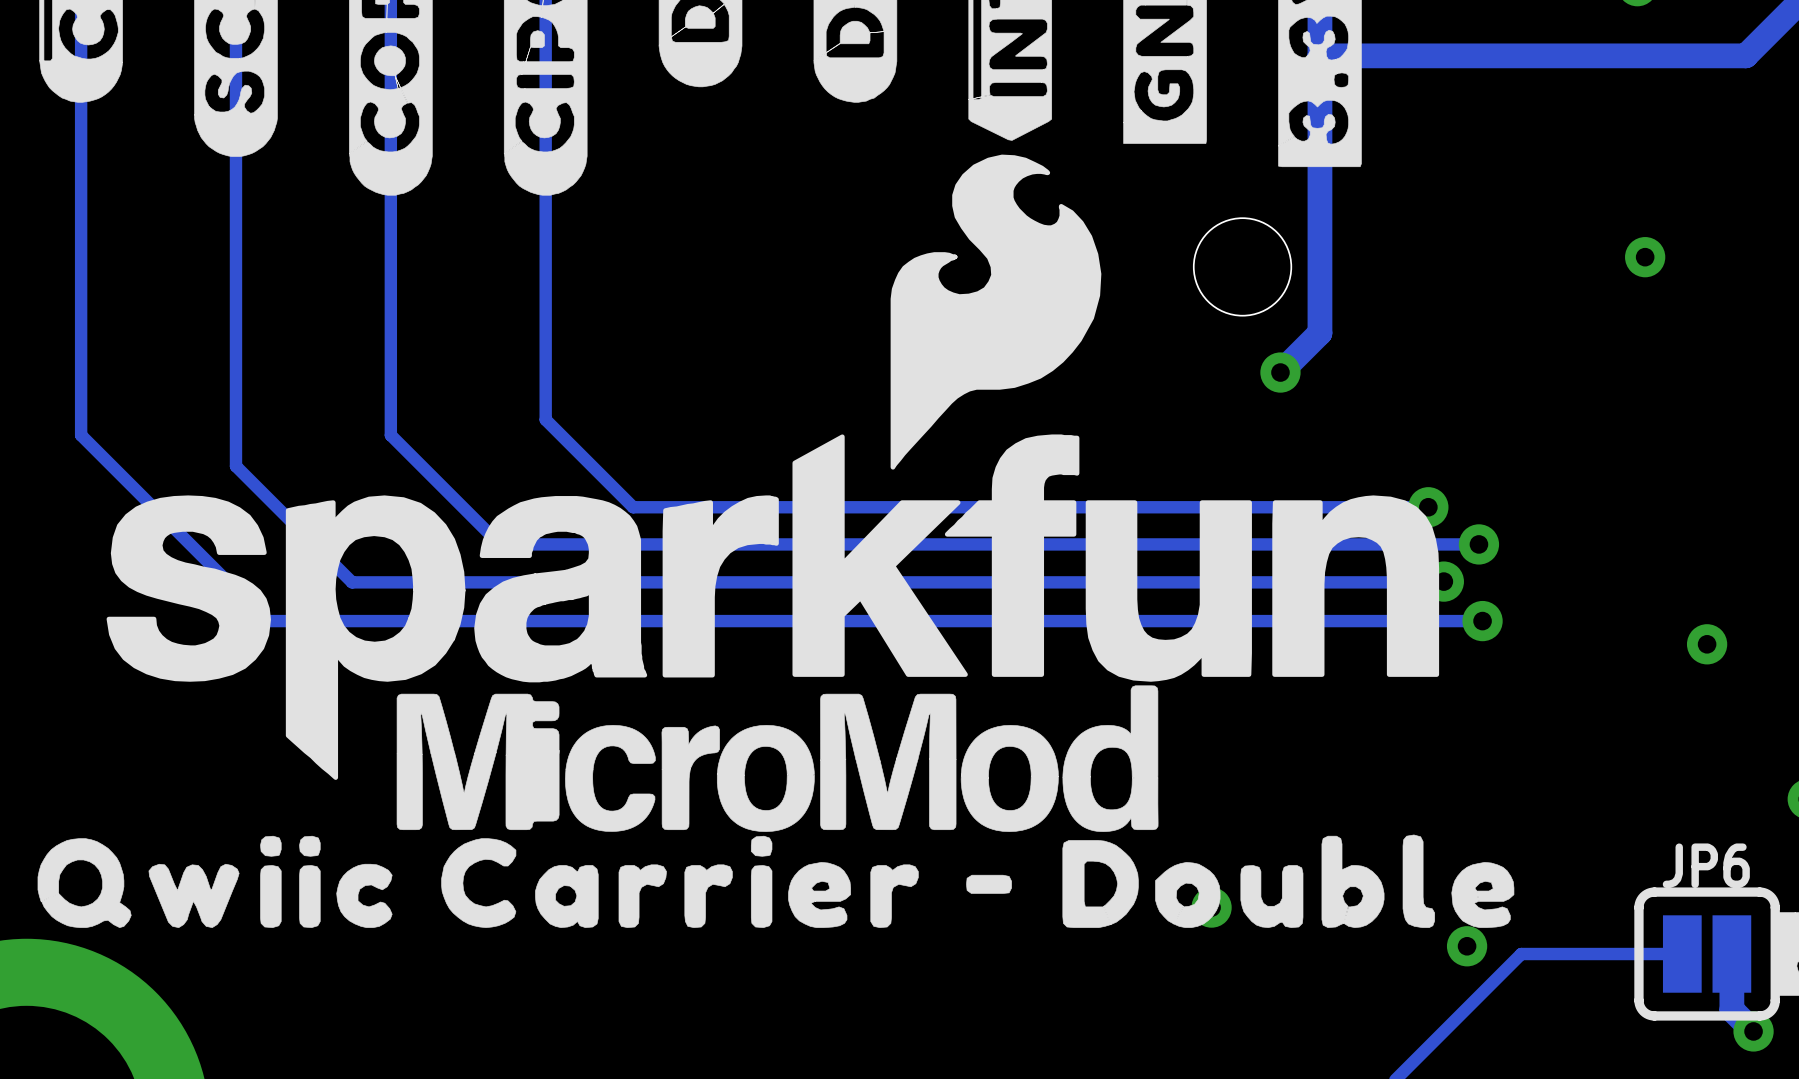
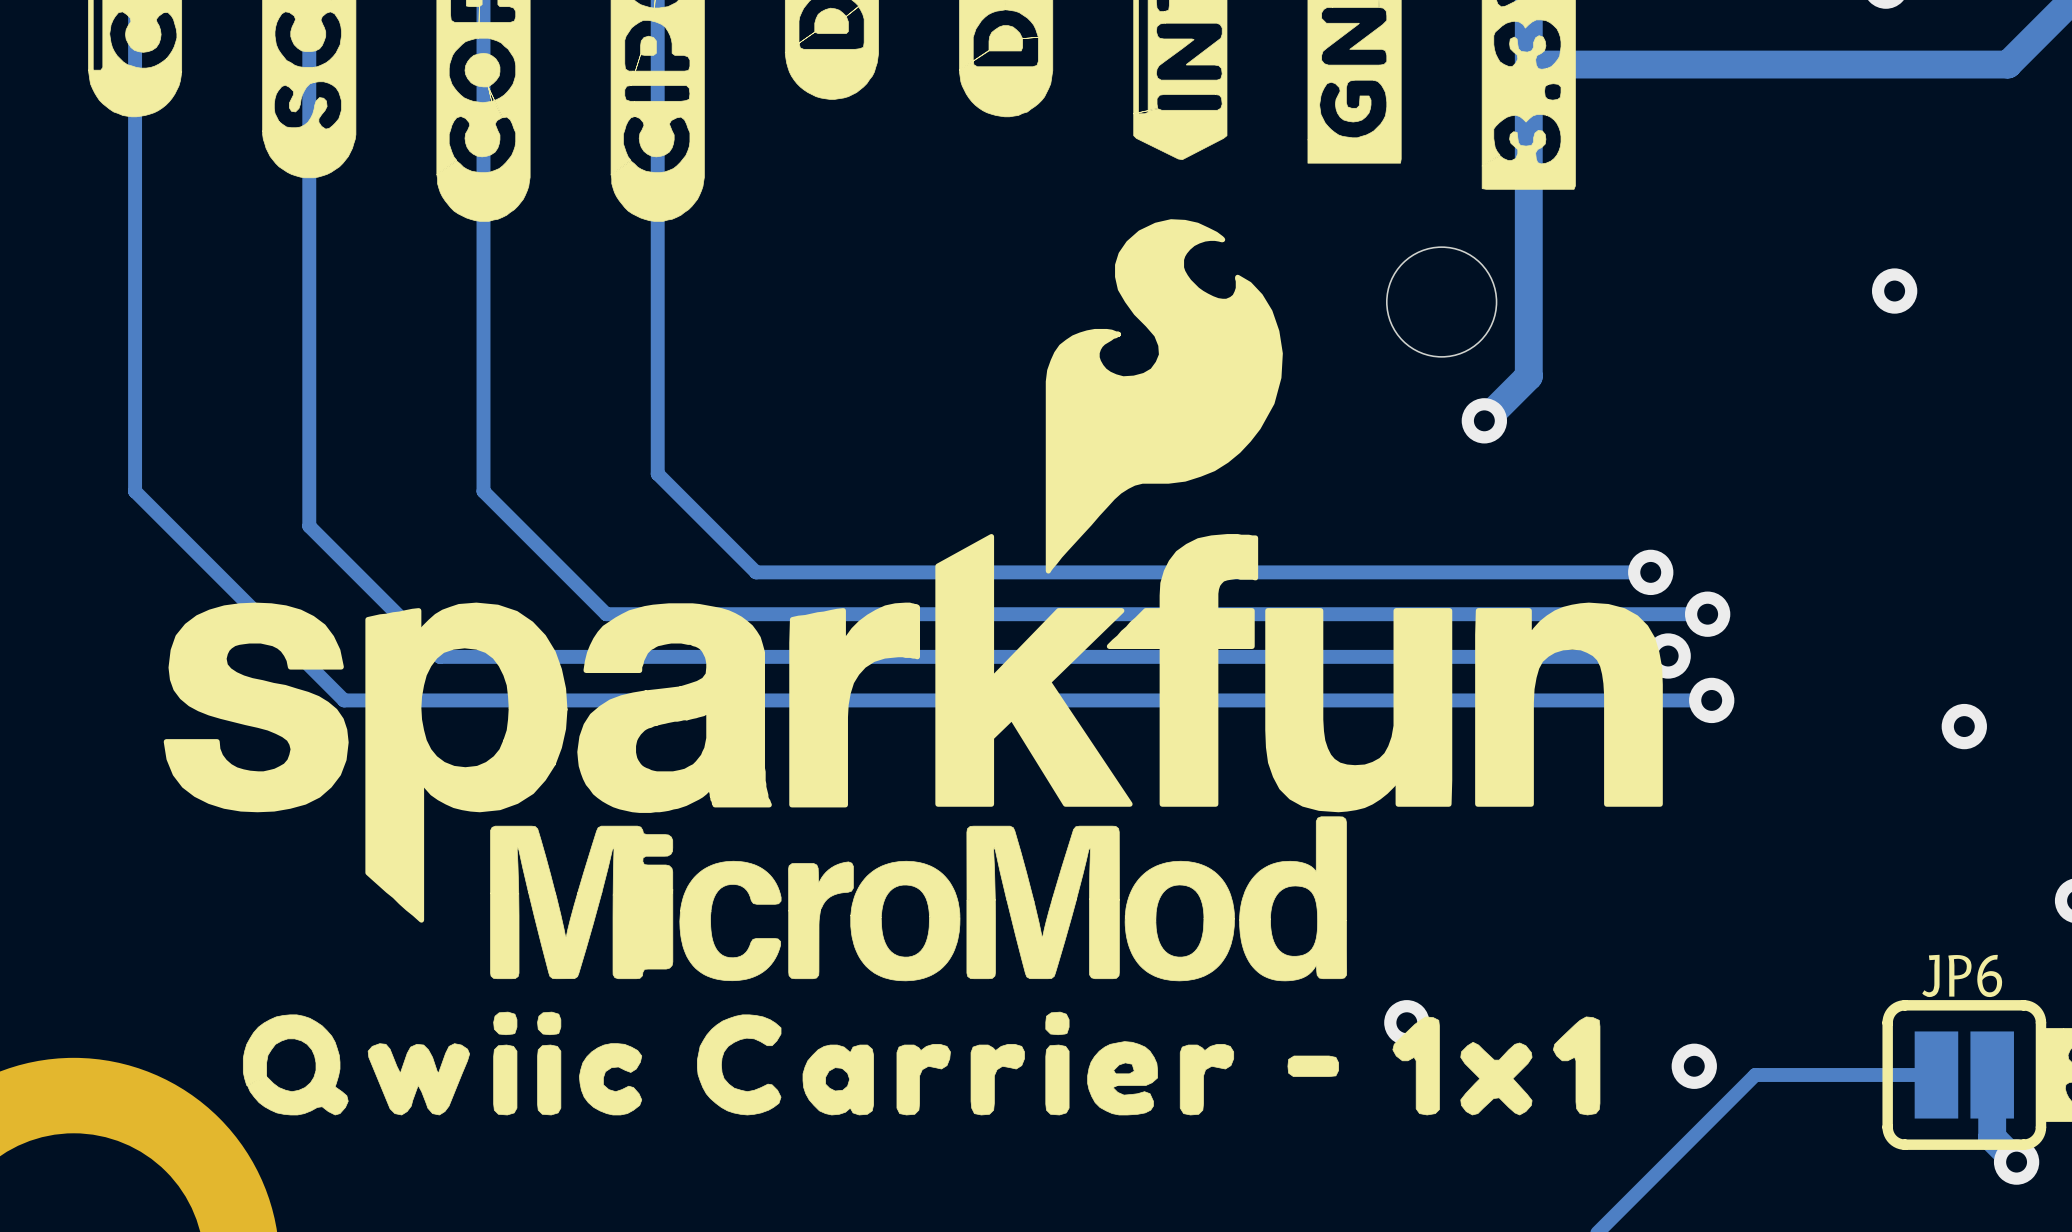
drawing position: (772, 467) -> (913, 570)
drawing position: (777, 758) -> (918, 898)
drawing: [37, 834, 1515, 928] -> none
drawing: none -> [242, 1011, 1601, 1116]

